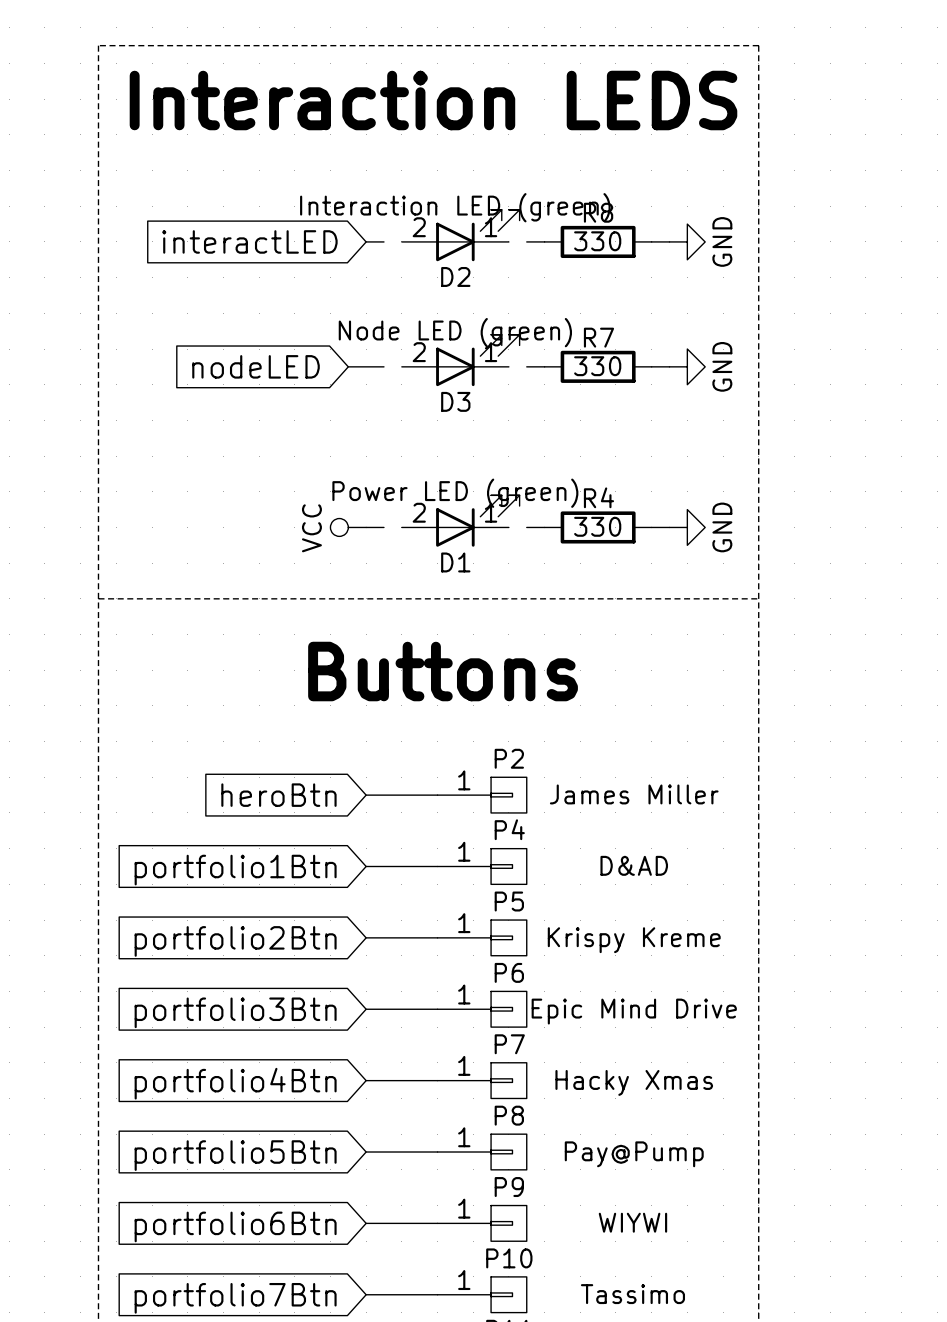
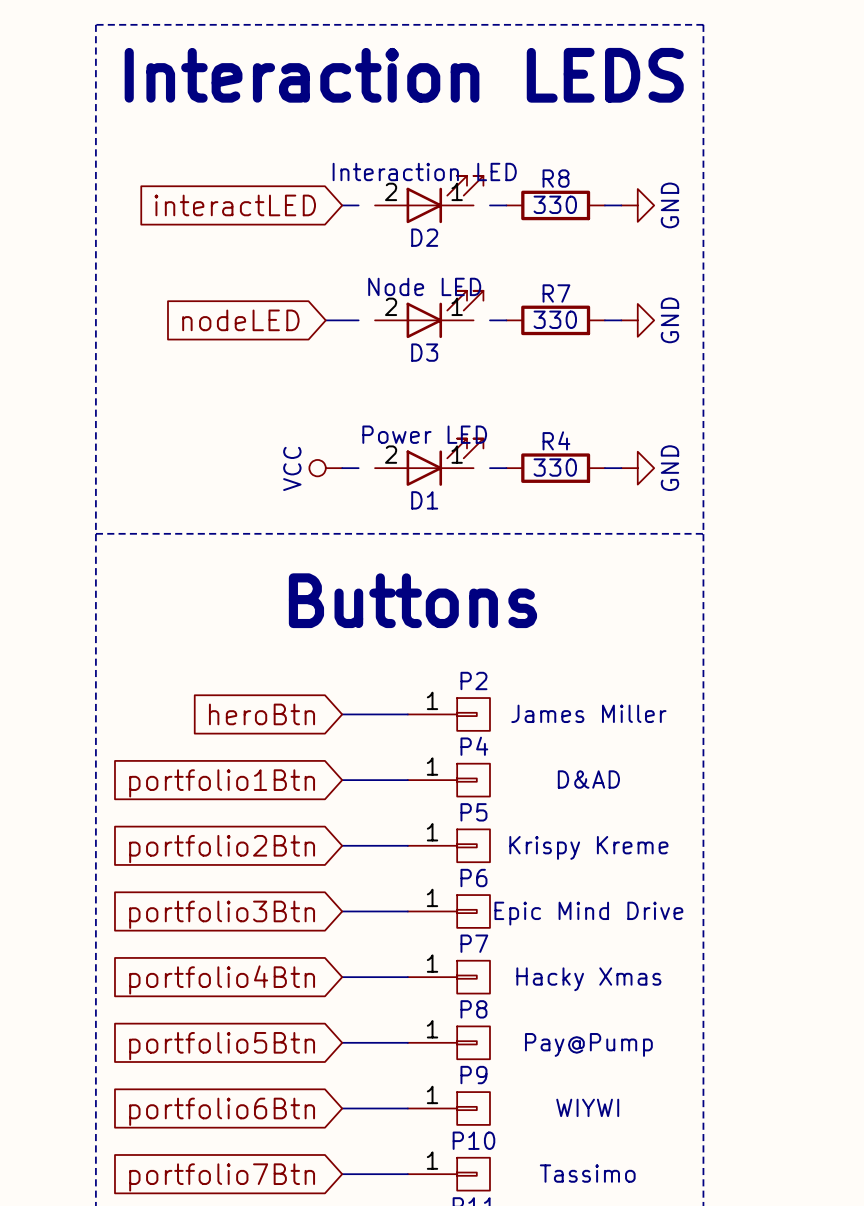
D2 value: Interaction LED (green) (455, 207) -> Interaction LED (424, 171)
D3 value: Node LED (green) (455, 332) -> Node LED (424, 286)
D1 value: Power LED (green) (455, 493) -> Power LED (424, 434)

